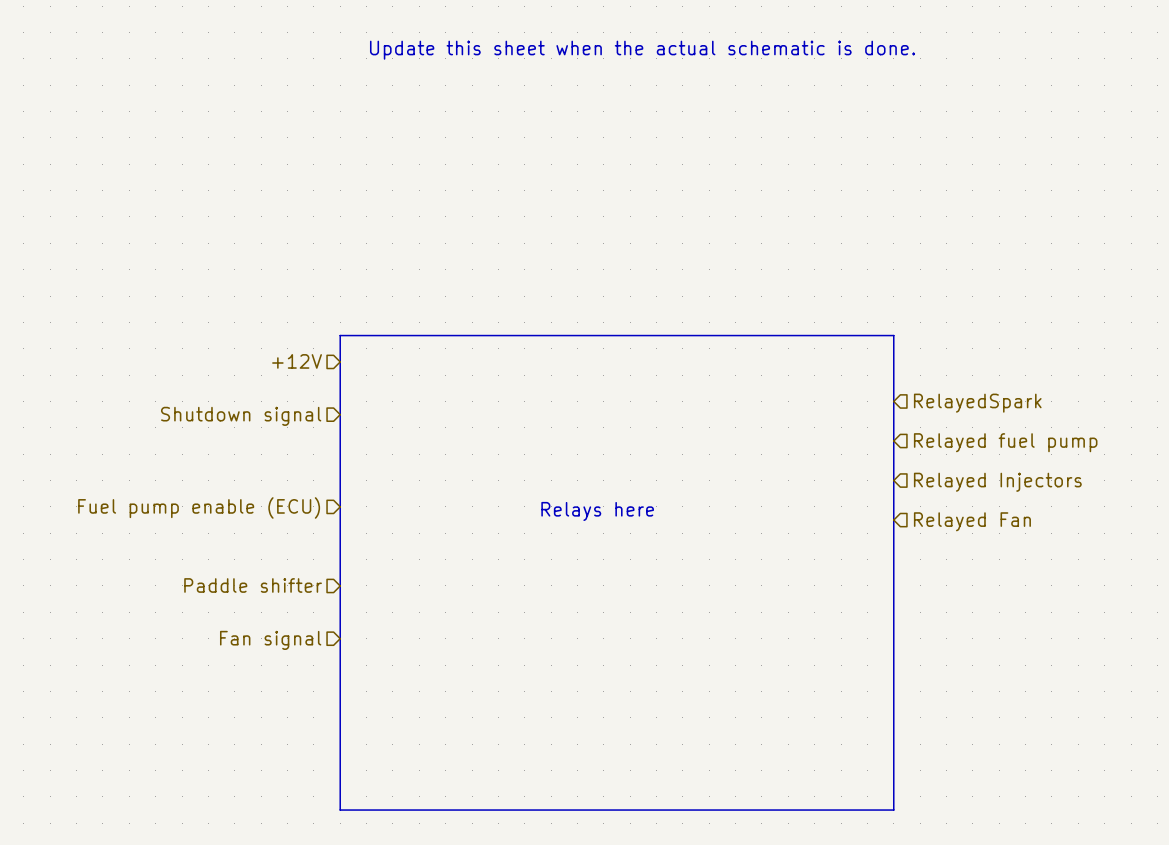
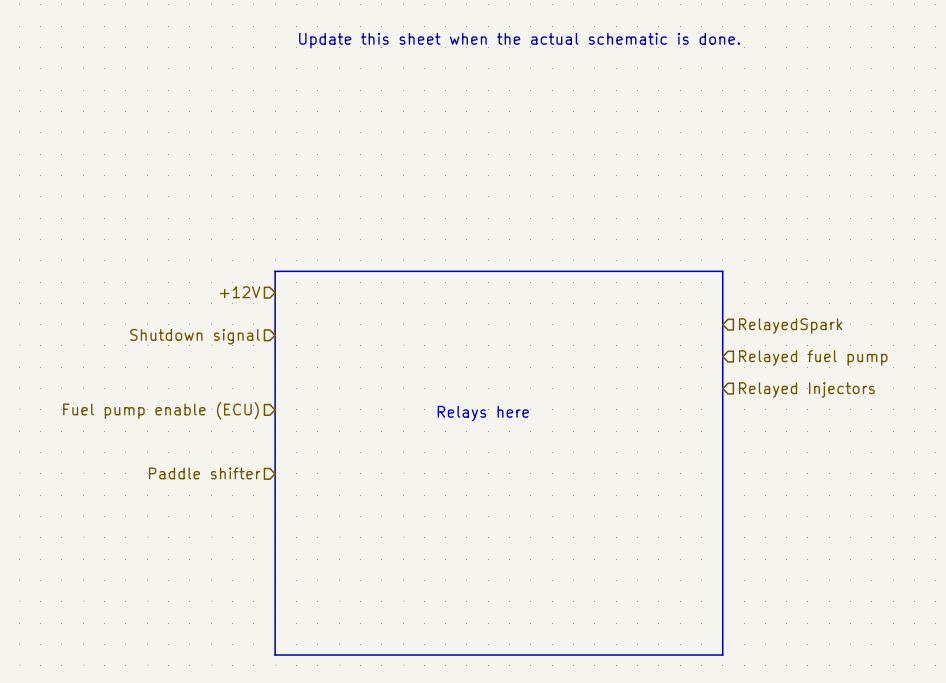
hierarchical label: Relayed Fan (972, 521) -> none
hierarchical label: Fan signal (270, 640) -> none

